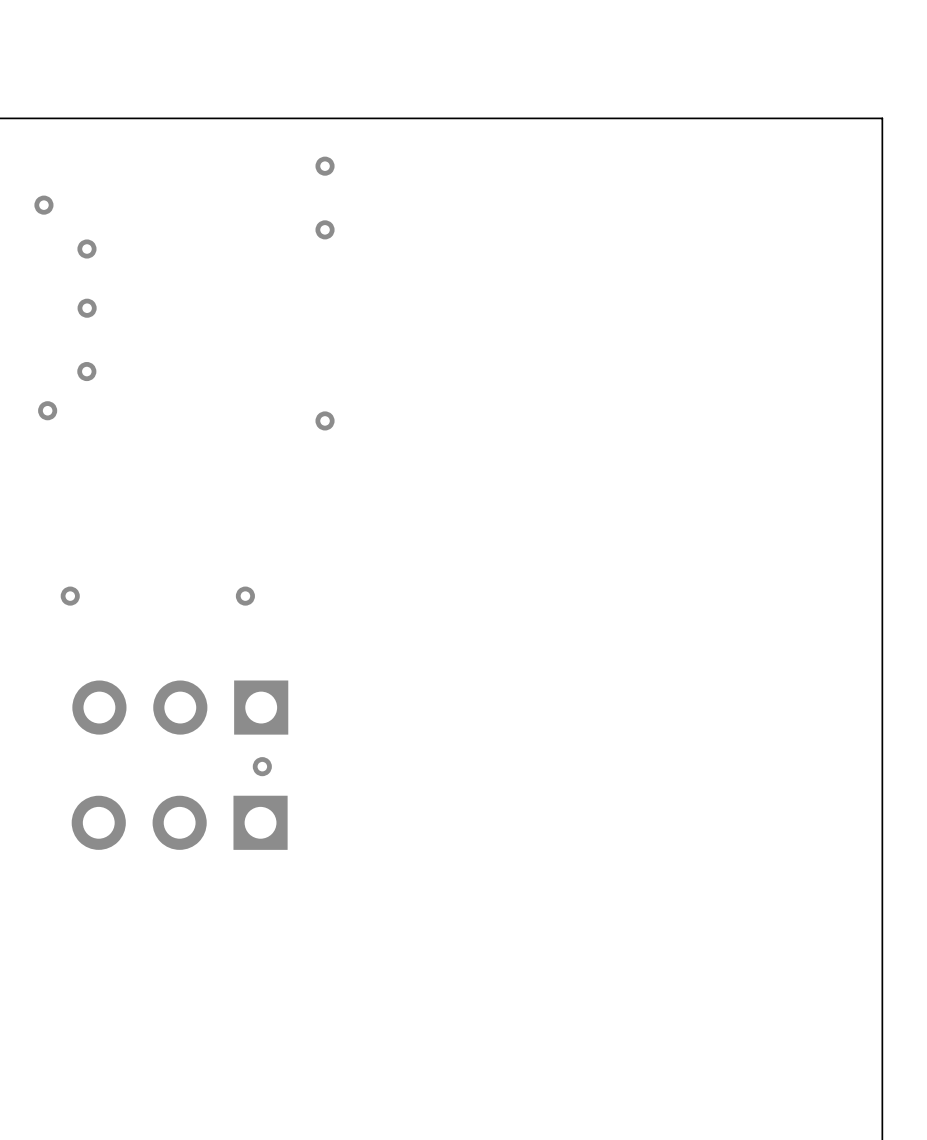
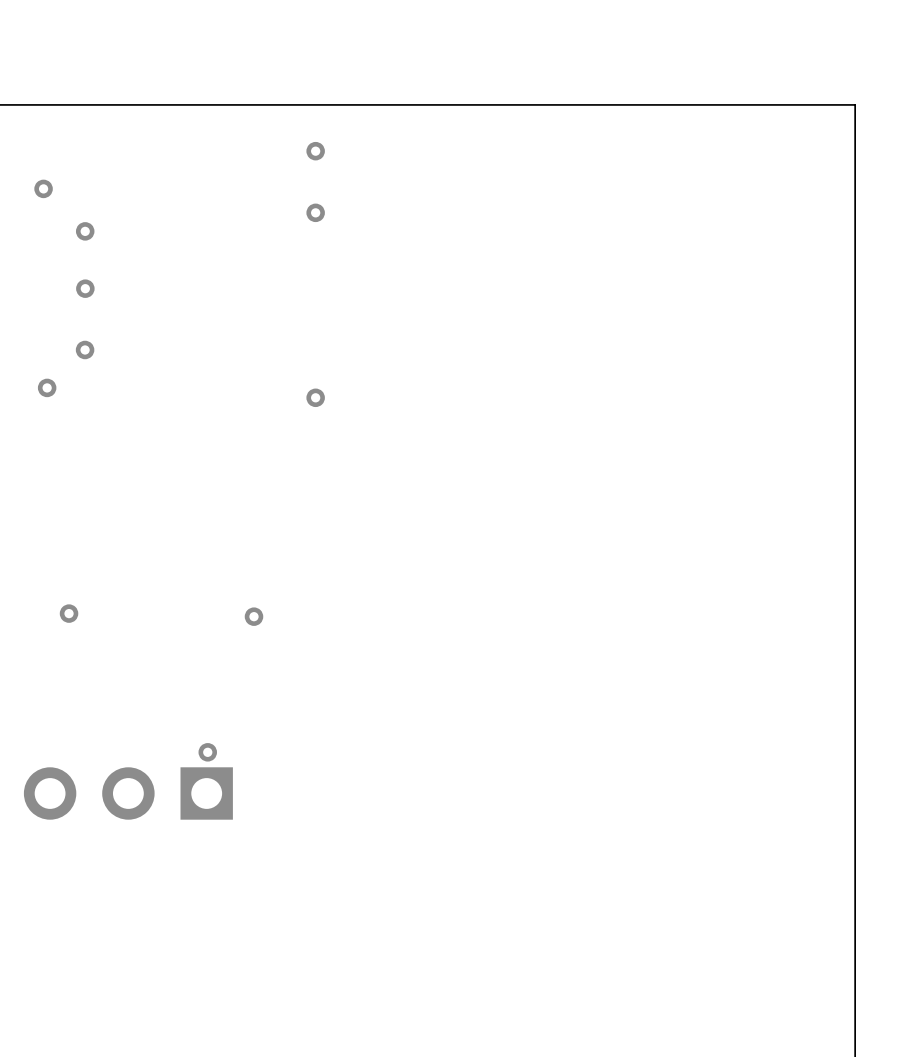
via position: (70, 596) -> (69, 613)
via position: (245, 596) -> (254, 616)
part: (180, 707) -> none
via position: (262, 766) -> (207, 752)
part position: (179, 822) -> (128, 793)

